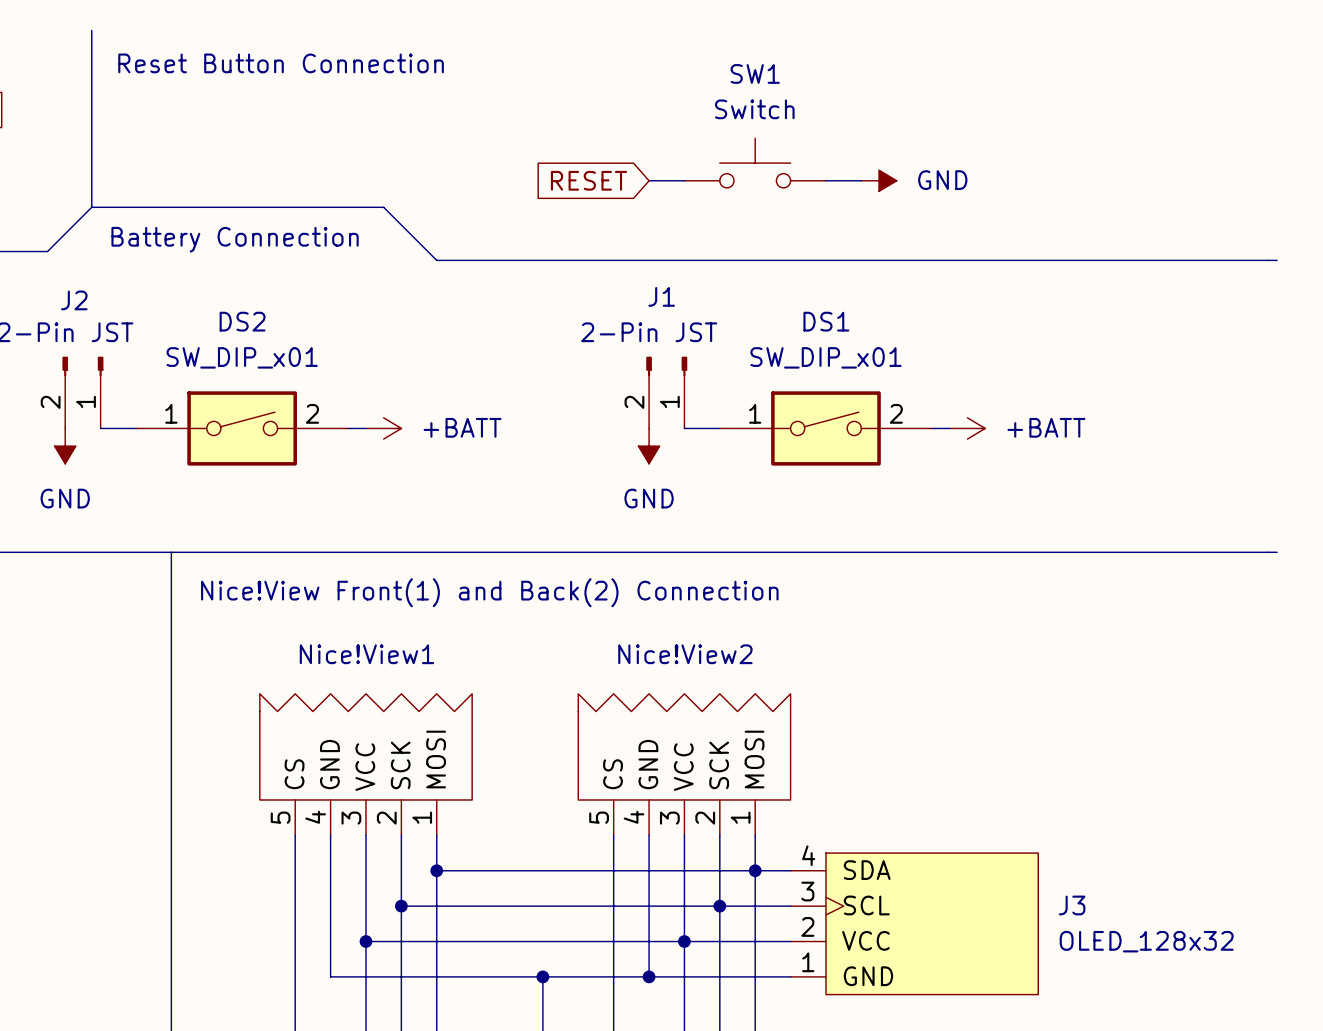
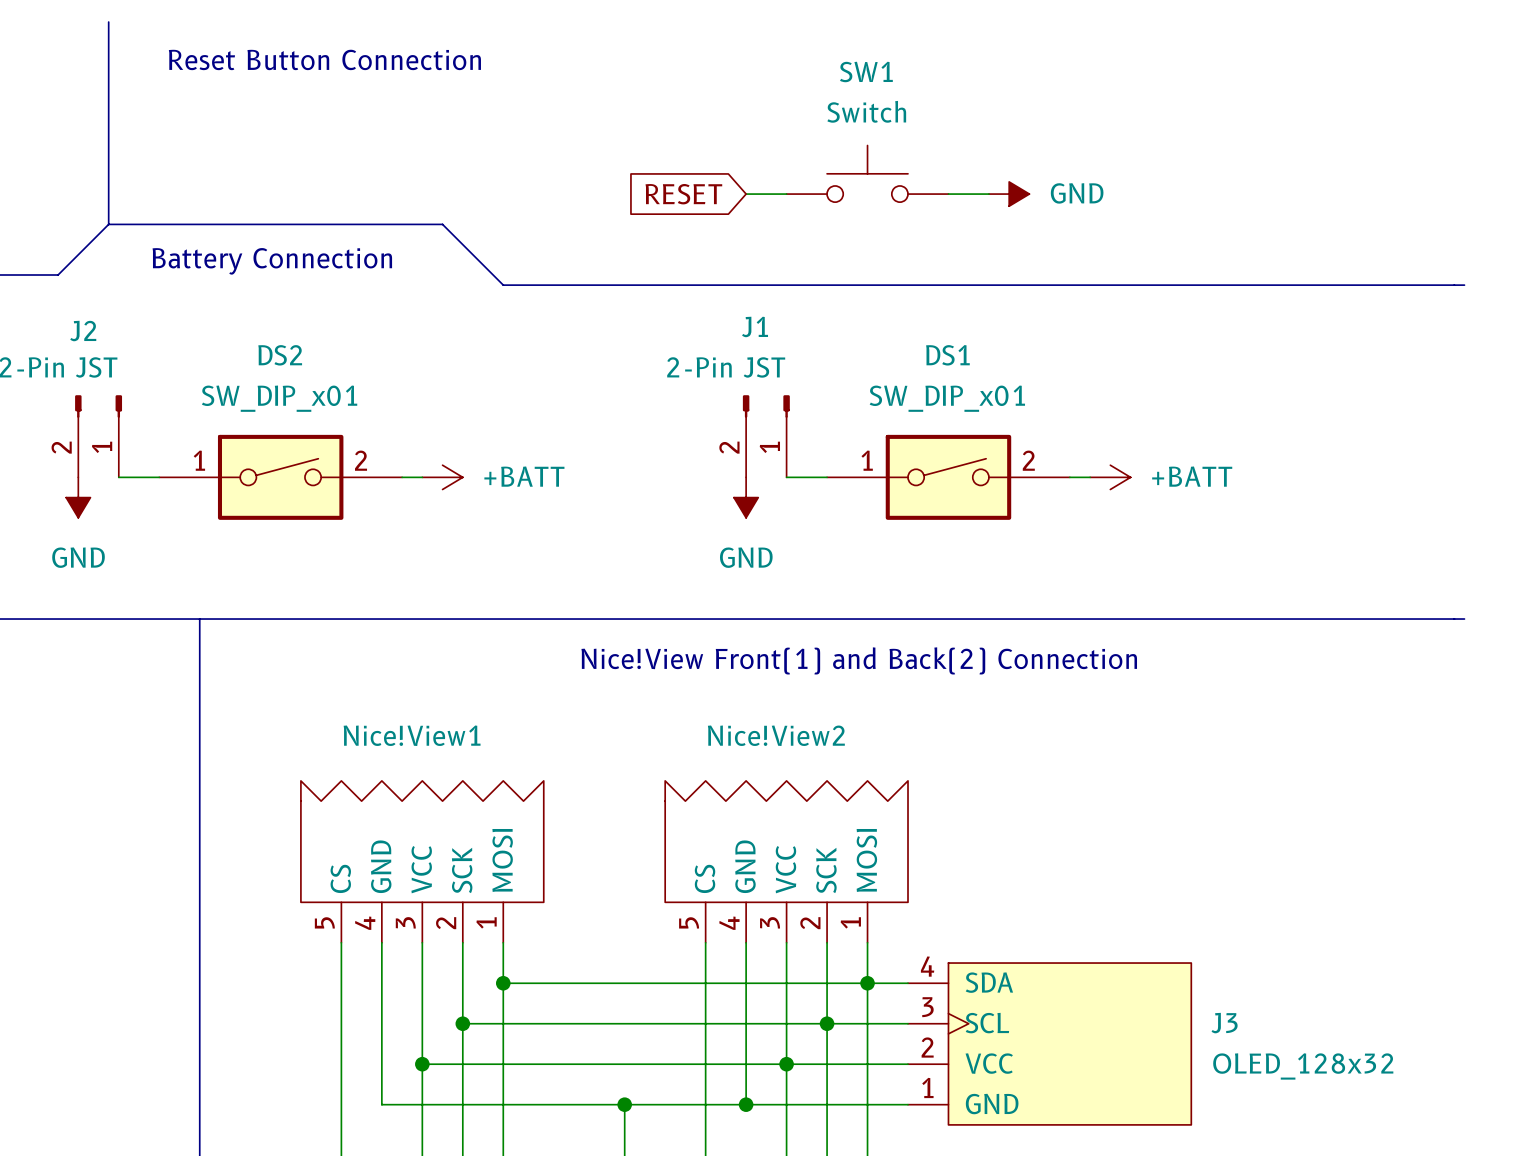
text position: Nice!View Front(1) and Back(2) Connection (489, 592) -> Nice!View Front(1) and Back(2) Connection (859, 660)

